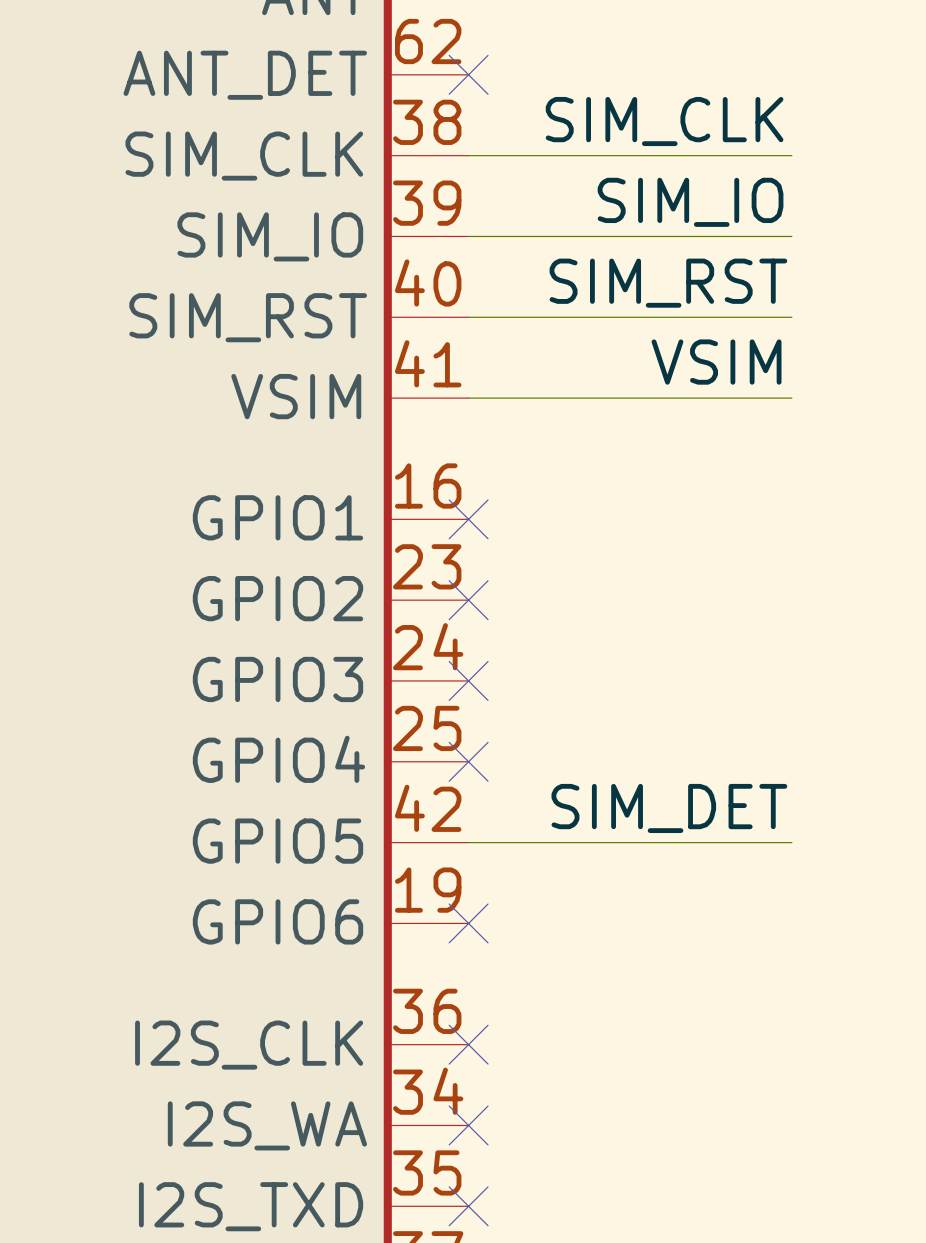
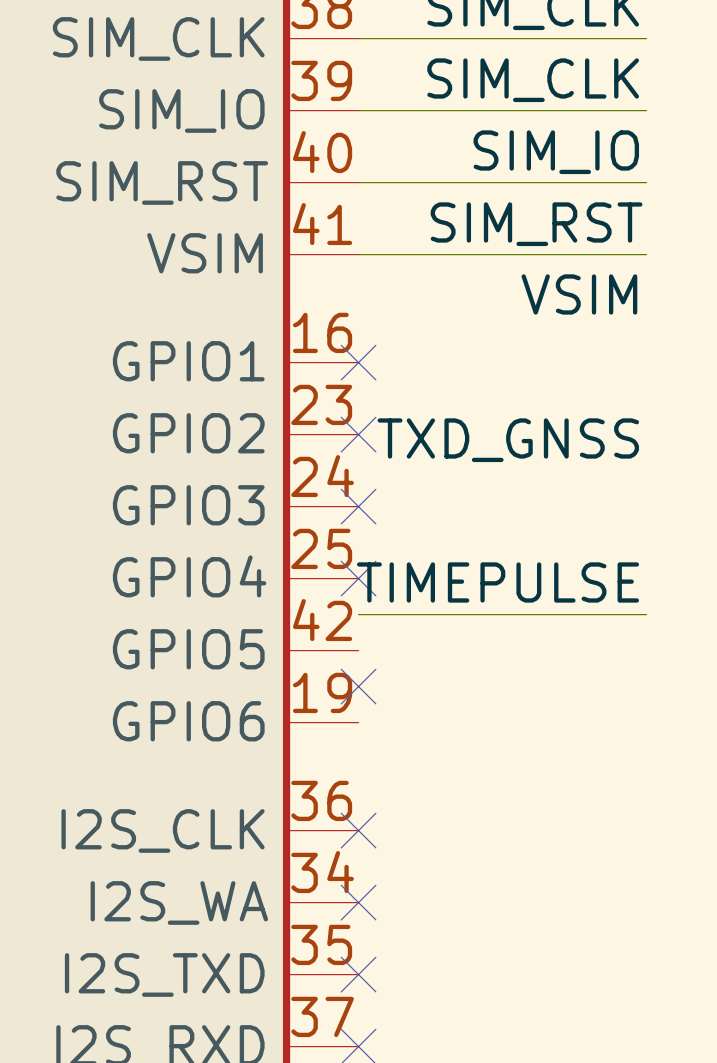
label: SIM_IO (690, 202) -> SIM_CLK (533, 80)
label: SIM_RST (668, 283) -> SIM_IO (556, 152)
label: VSIM (716, 362) -> SIM_RST (536, 224)
label: none -> VSIM (579, 294)
label: none -> TXD_GNSS (508, 440)
label: none -> TIMEPULSE (498, 582)
label: SIM_DET (669, 808) -> none
wire: (468, 842) (791, 842) -> (358, 614) (646, 614)
no-connect mark position: (468, 923) -> (358, 686)

